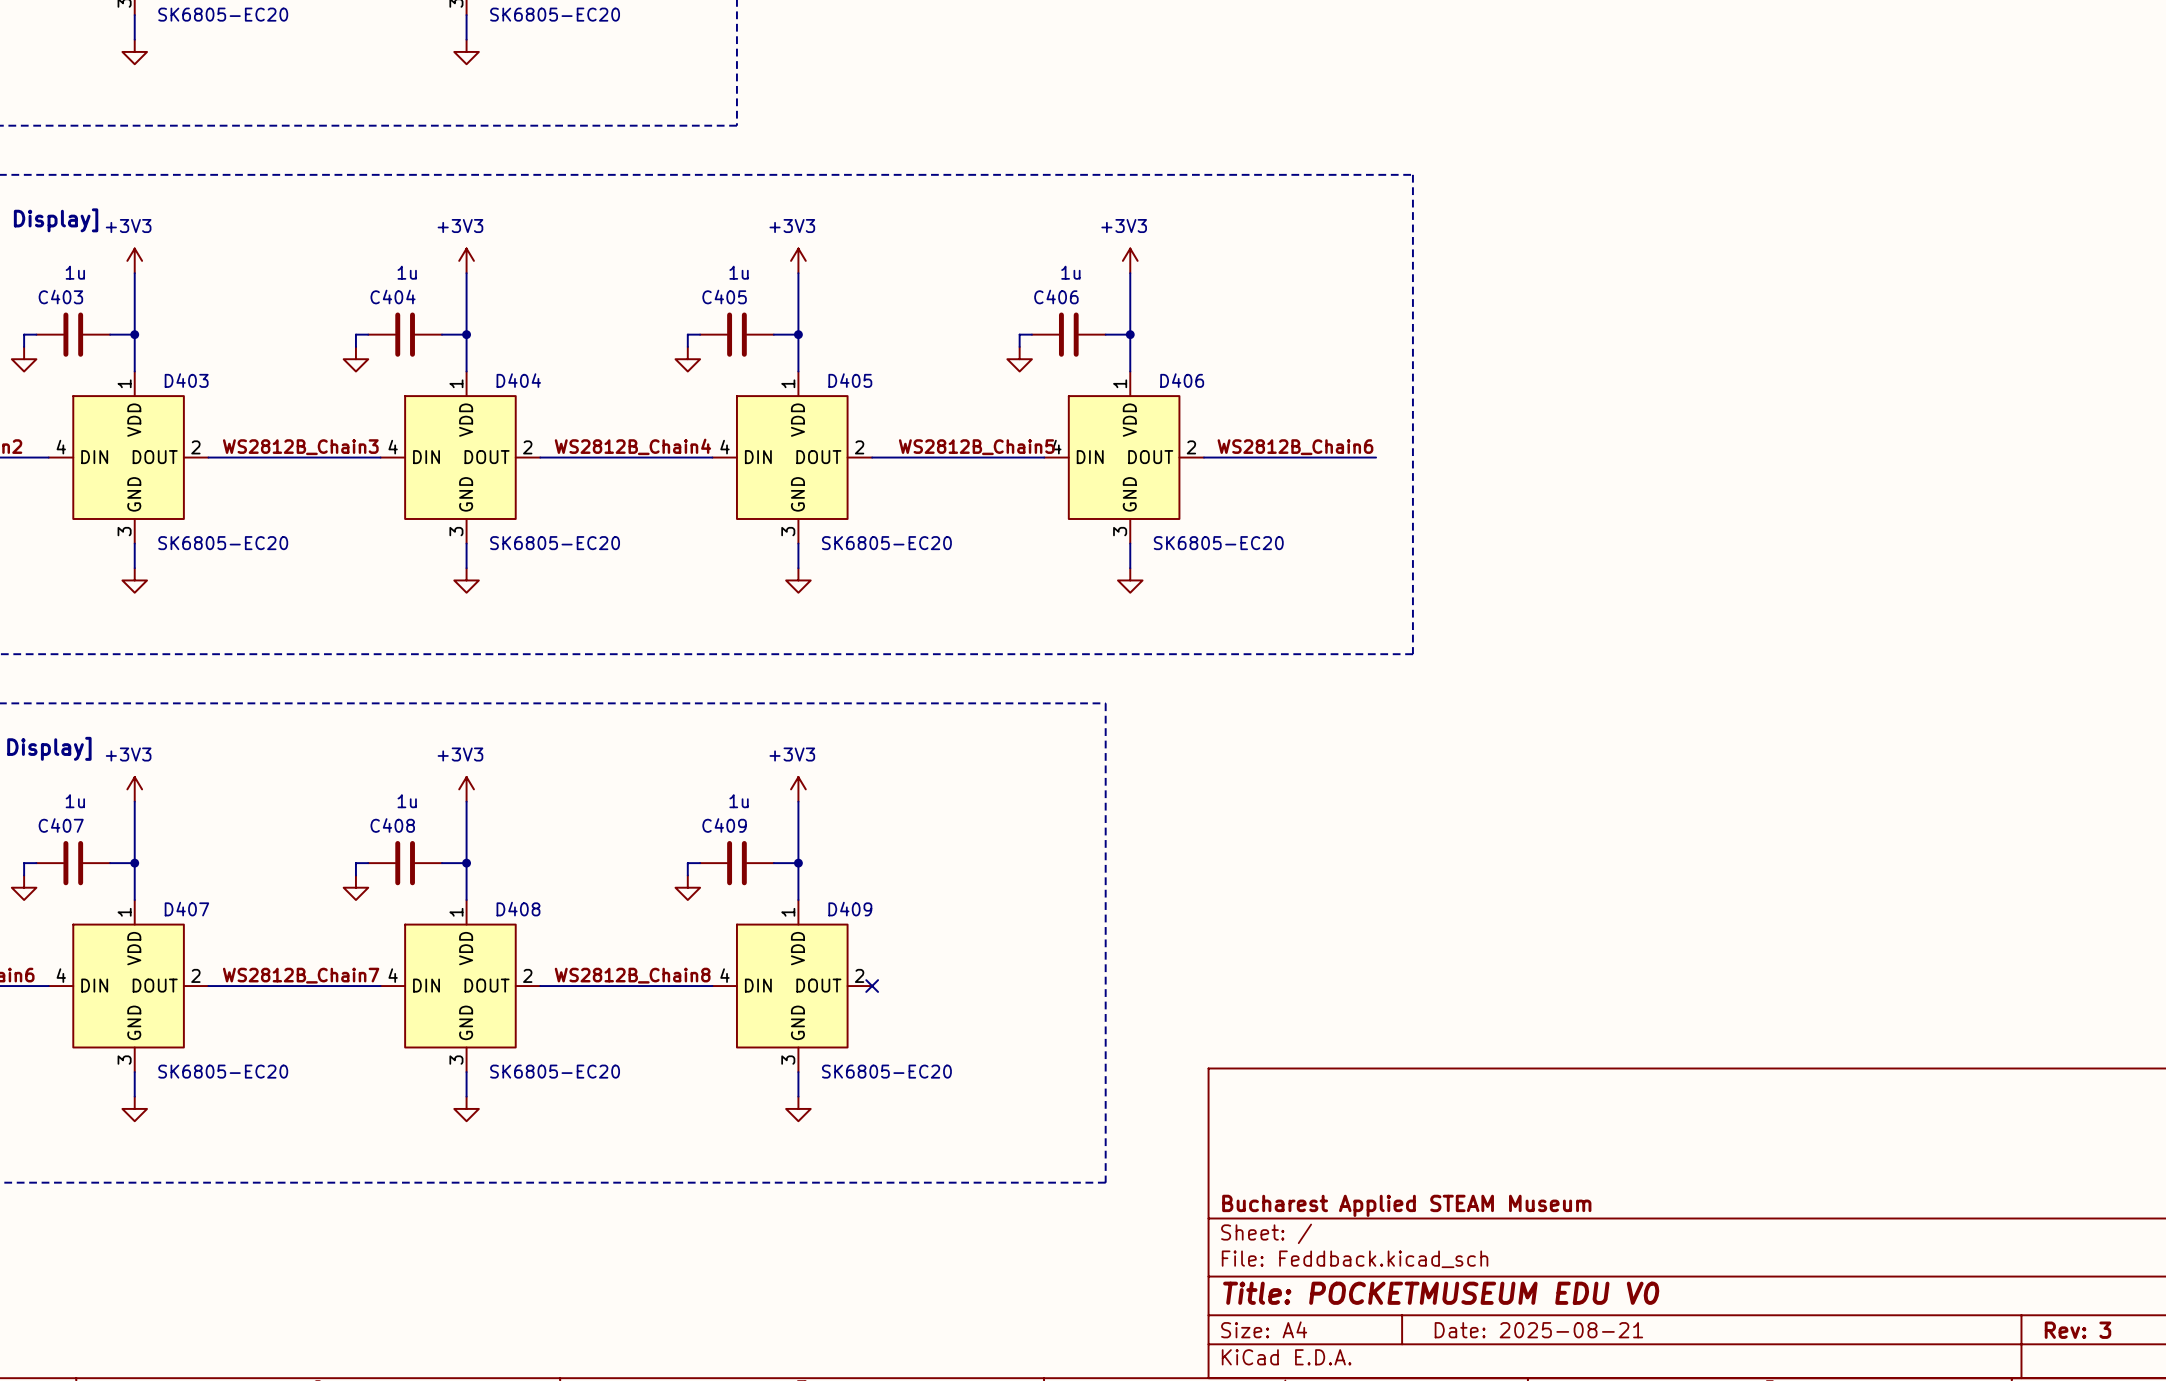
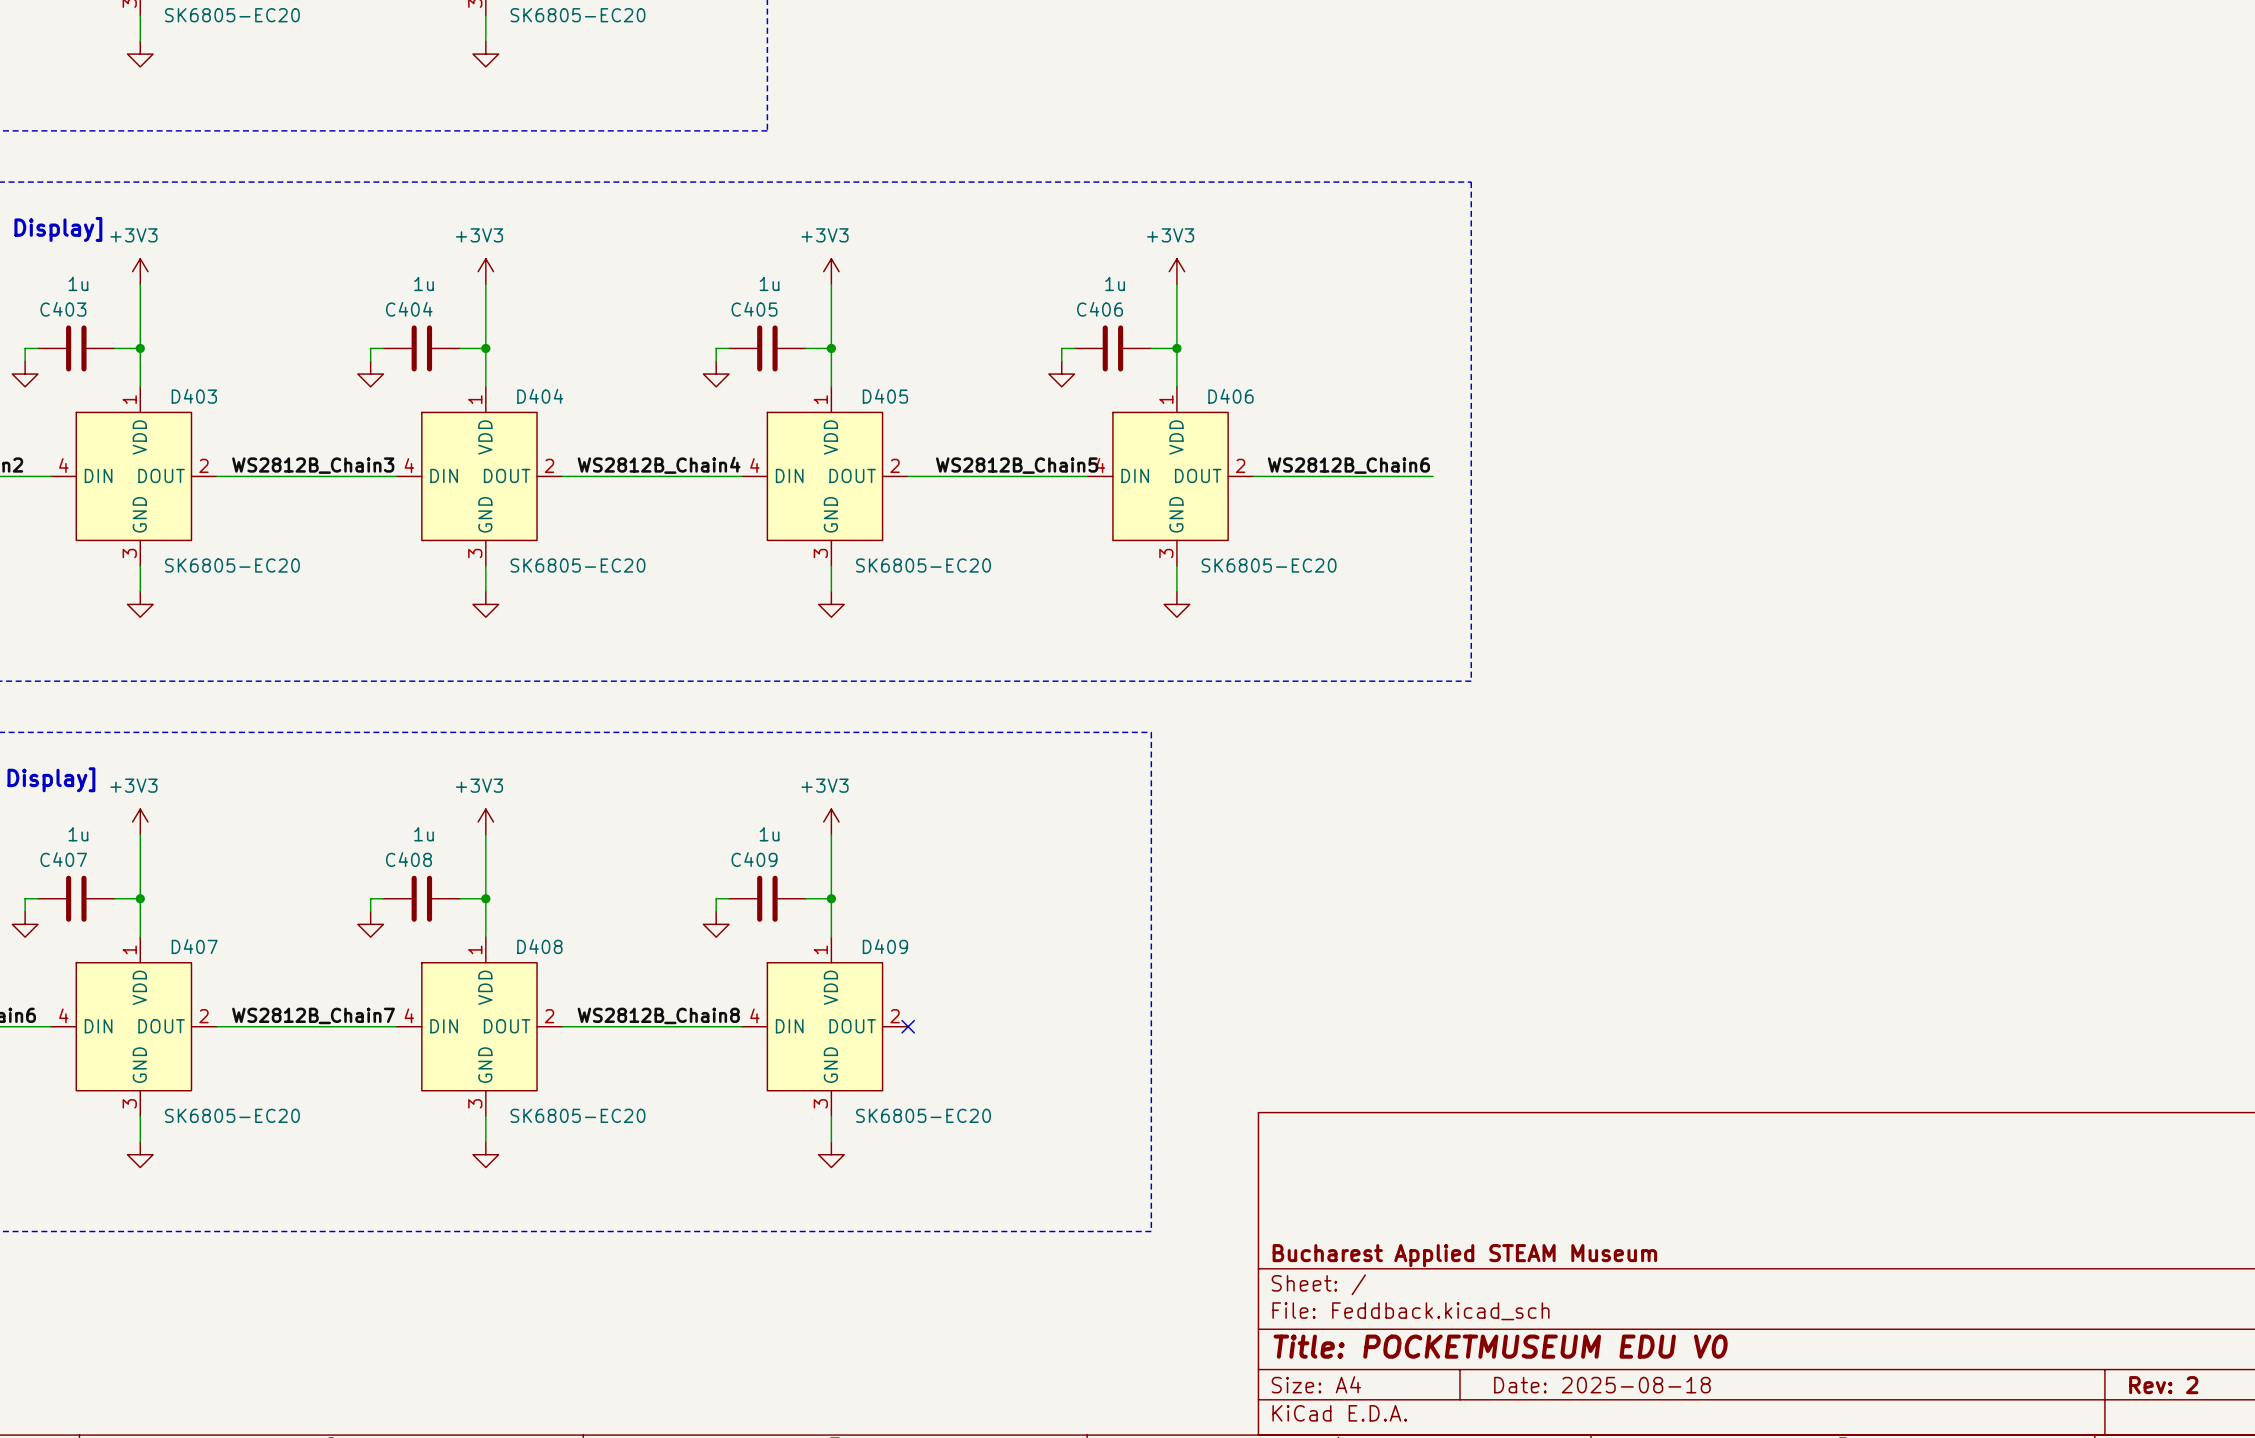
title block: Date: 2025-08-21 (1538, 1330) -> Date: 2025-08-18 (1602, 1385)
title block: Rev: 3 (2077, 1330) -> Rev: 2 (2163, 1385)

